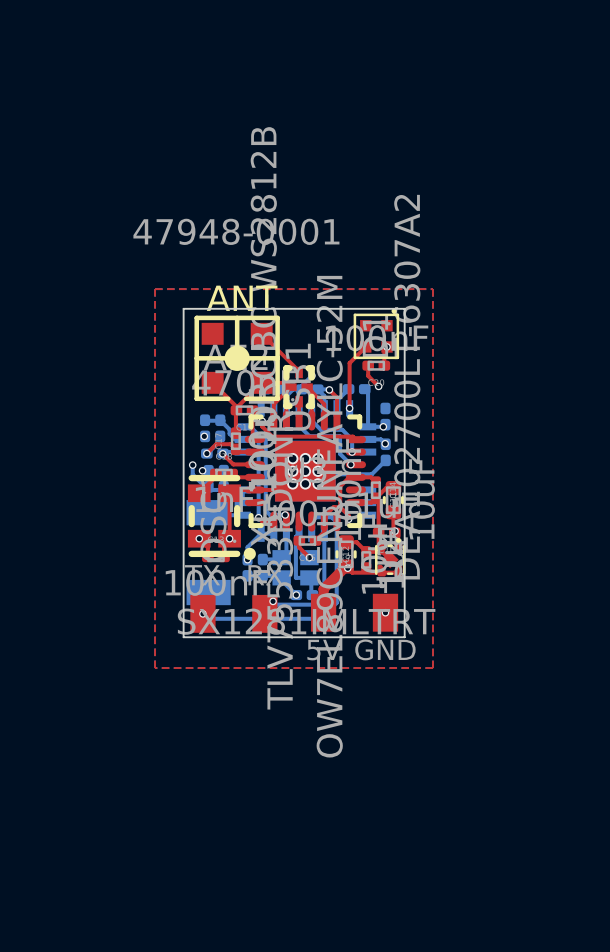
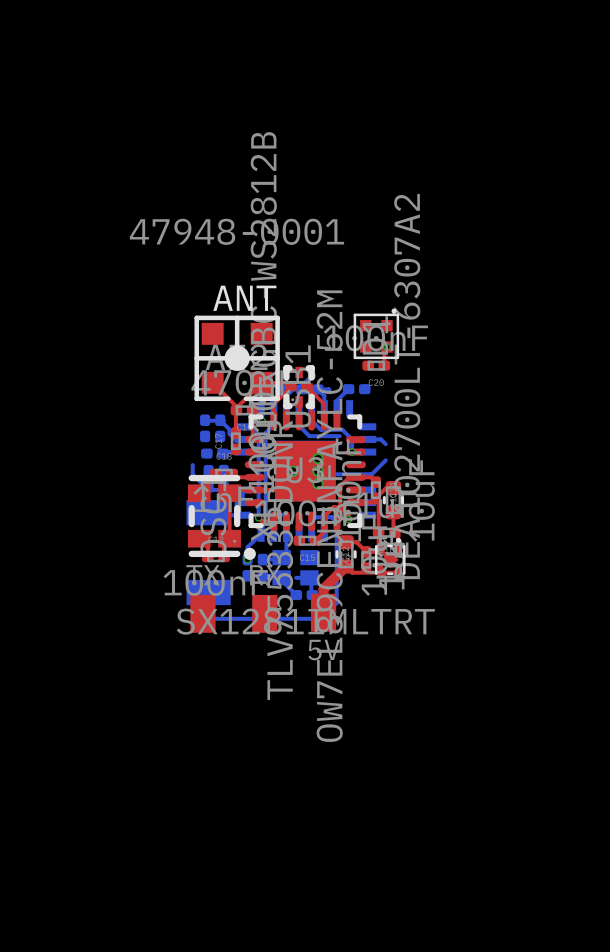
top zone outline: (155, 289) (432, 289) (432, 668) (155, 668) (155, 289) -> none
board edge: (183, 308) (404, 308) (404, 637) (183, 637) (183, 308) -> none
top track: (261, 333) (299, 372) -> none
top track: (365, 346) (349, 363) (349, 408) -> none
top track: (368, 365) (368, 375) (378, 386) -> none
via: (378, 386) -> none
top track: (329, 389) (336, 397) (336, 420) -> none
via: (329, 389) -> none
bottom track: (364, 389) (368, 392) (368, 426) (383, 426) (385, 424) -> none
via: (349, 408) -> none
part: (385, 416) -> none
top track: (262, 421) (262, 426) (272, 436) (352, 436) (355, 439) -> none
via: (383, 426) -> none
via: (204, 436) -> none
bottom track: (340, 436) (340, 453) (350, 464) -> none
via: (385, 443) -> none
top track: (254, 452) (238, 452) (230, 444) (216, 444) (206, 453) -> none
part: (385, 452) -> none
via: (206, 453) -> none
top track: (222, 453) (233, 464) (254, 464) -> none
via: (222, 453) -> none
via: (292, 458) -> none
via: (305, 458) -> none
via: (350, 464) -> none
via: (192, 465) -> none
via: (202, 470) -> none
via: (305, 471) -> none
via: (292, 483) -> none
via: (305, 483) -> none
via: (285, 514) -> none
via: (395, 531) -> none
bottom track: (299, 533) (295, 536) (295, 577) -> none
bottom track: (324, 533) (324, 598) (318, 604) (276, 604) (273, 601) -> none
via: (199, 538) -> none
via: (229, 538) -> none
top track: (299, 540) (299, 547) (309, 557) -> none
via: (309, 557) -> none
via: (347, 568) -> none
via: (296, 595) -> none
via: (273, 601) -> none
part: GND (385, 612) -> none
via: (385, 612) -> none
via: (202, 613) -> none

